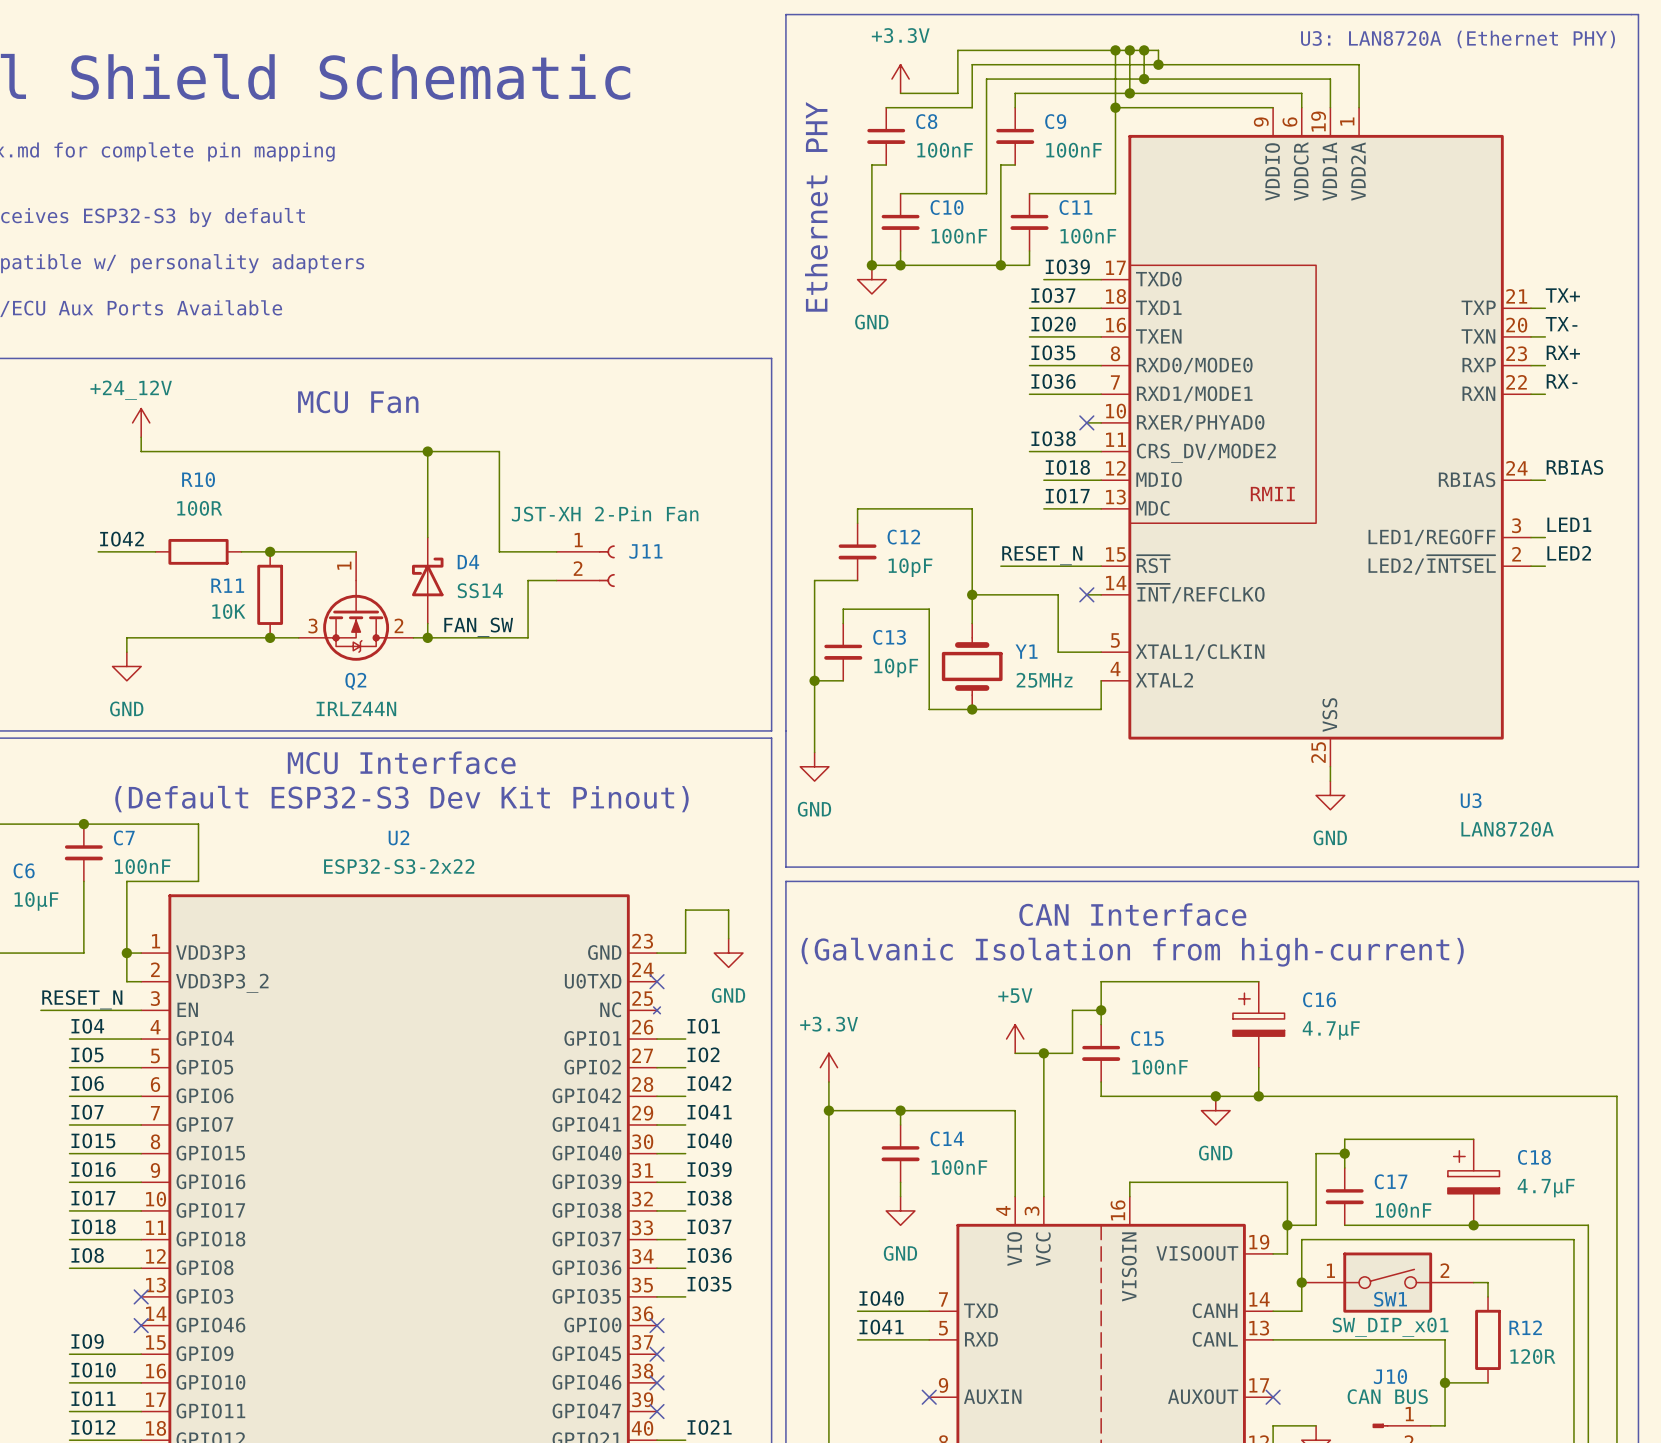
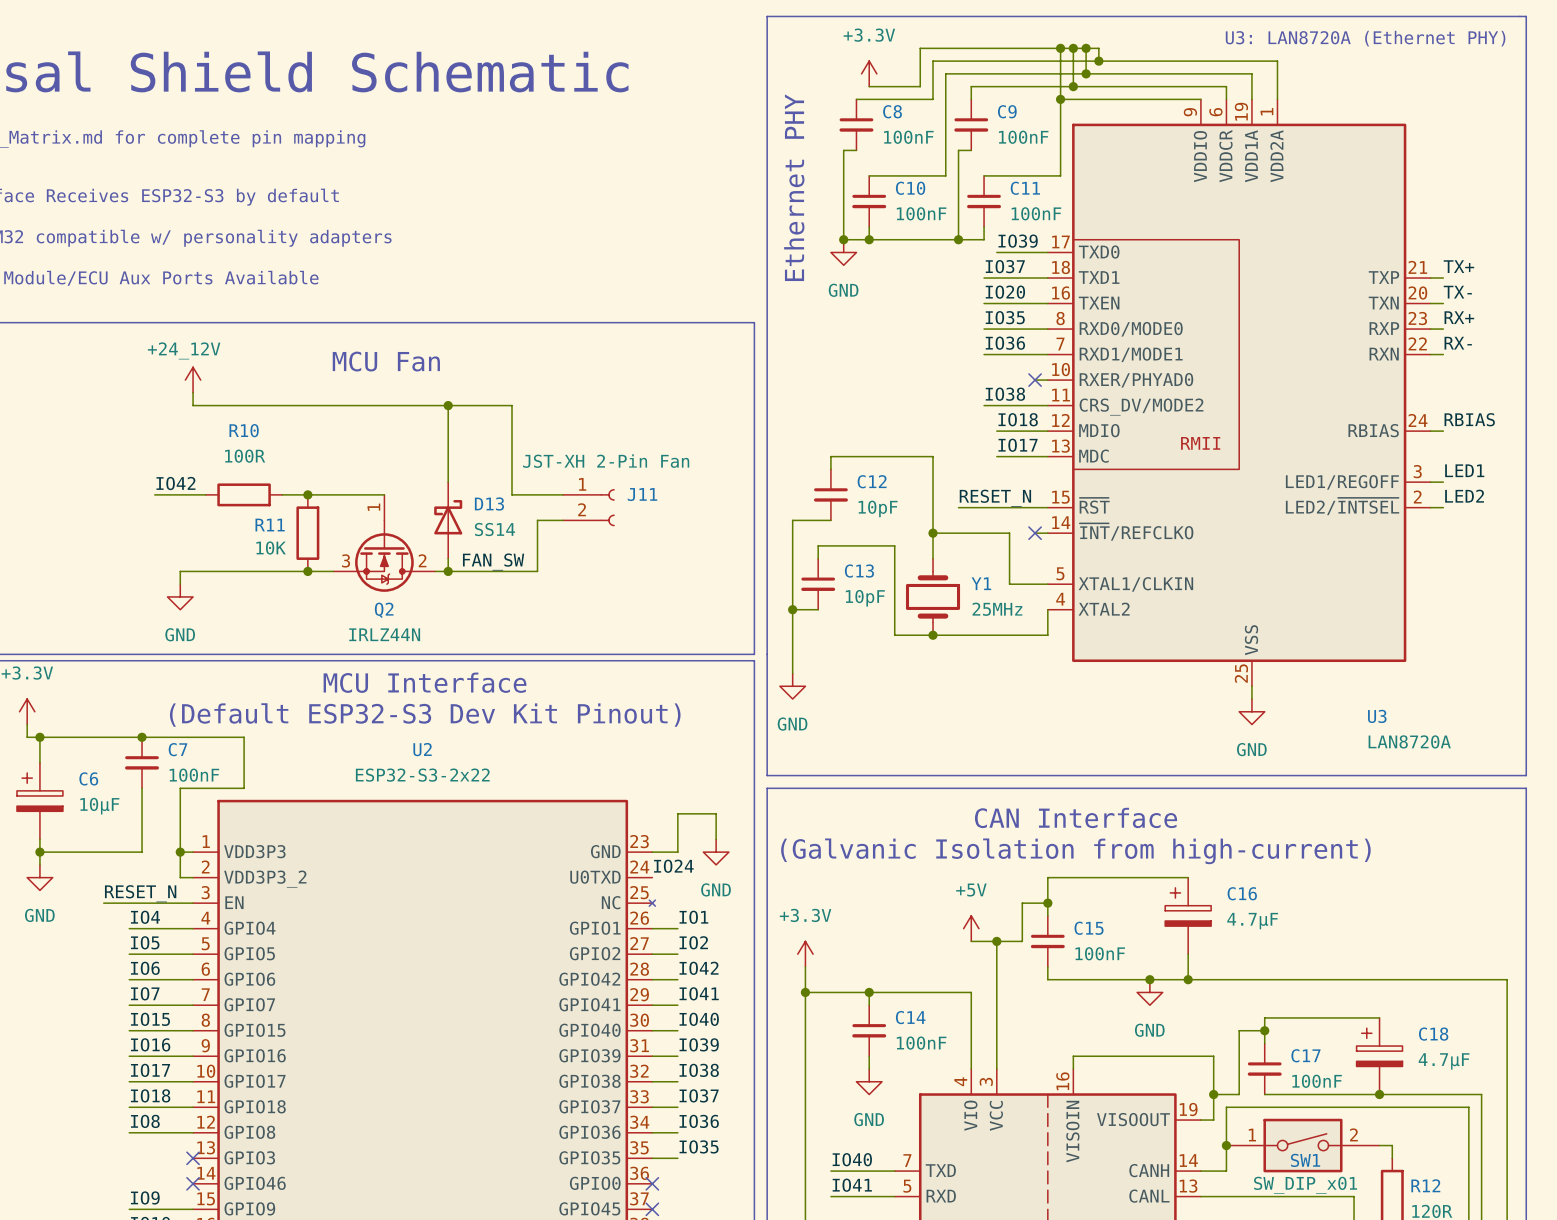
D4 name: D4 (468, 562) -> D13 (489, 503)
label: none -> IO24 (673, 866)
no-connect mark: (656, 981) -> none

